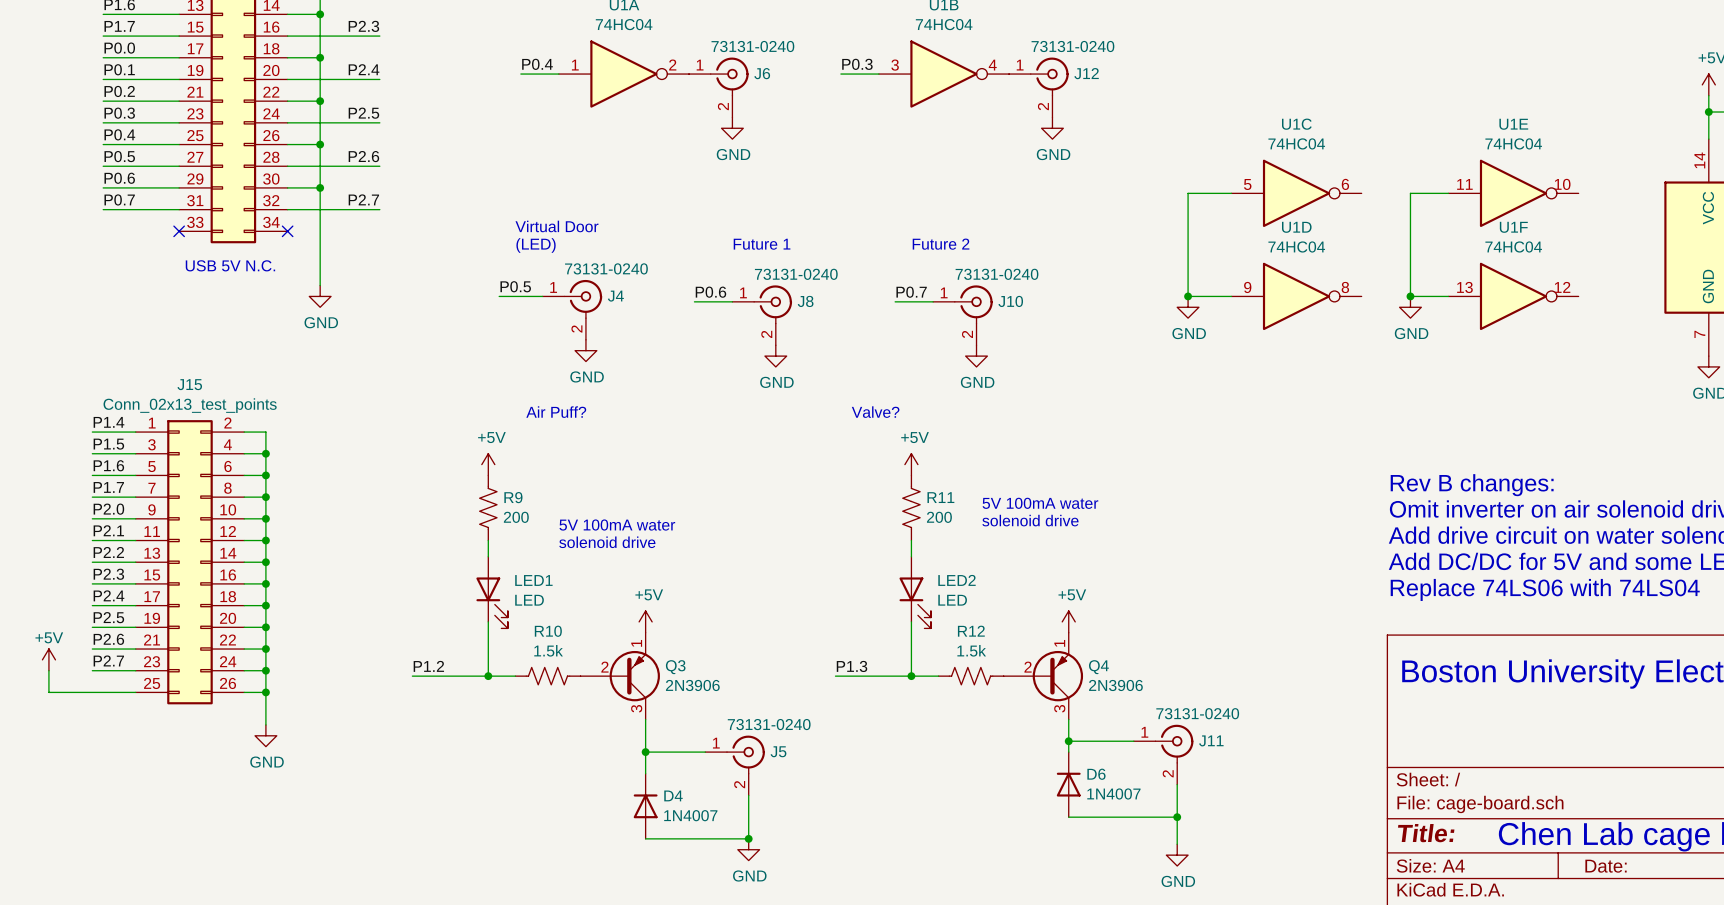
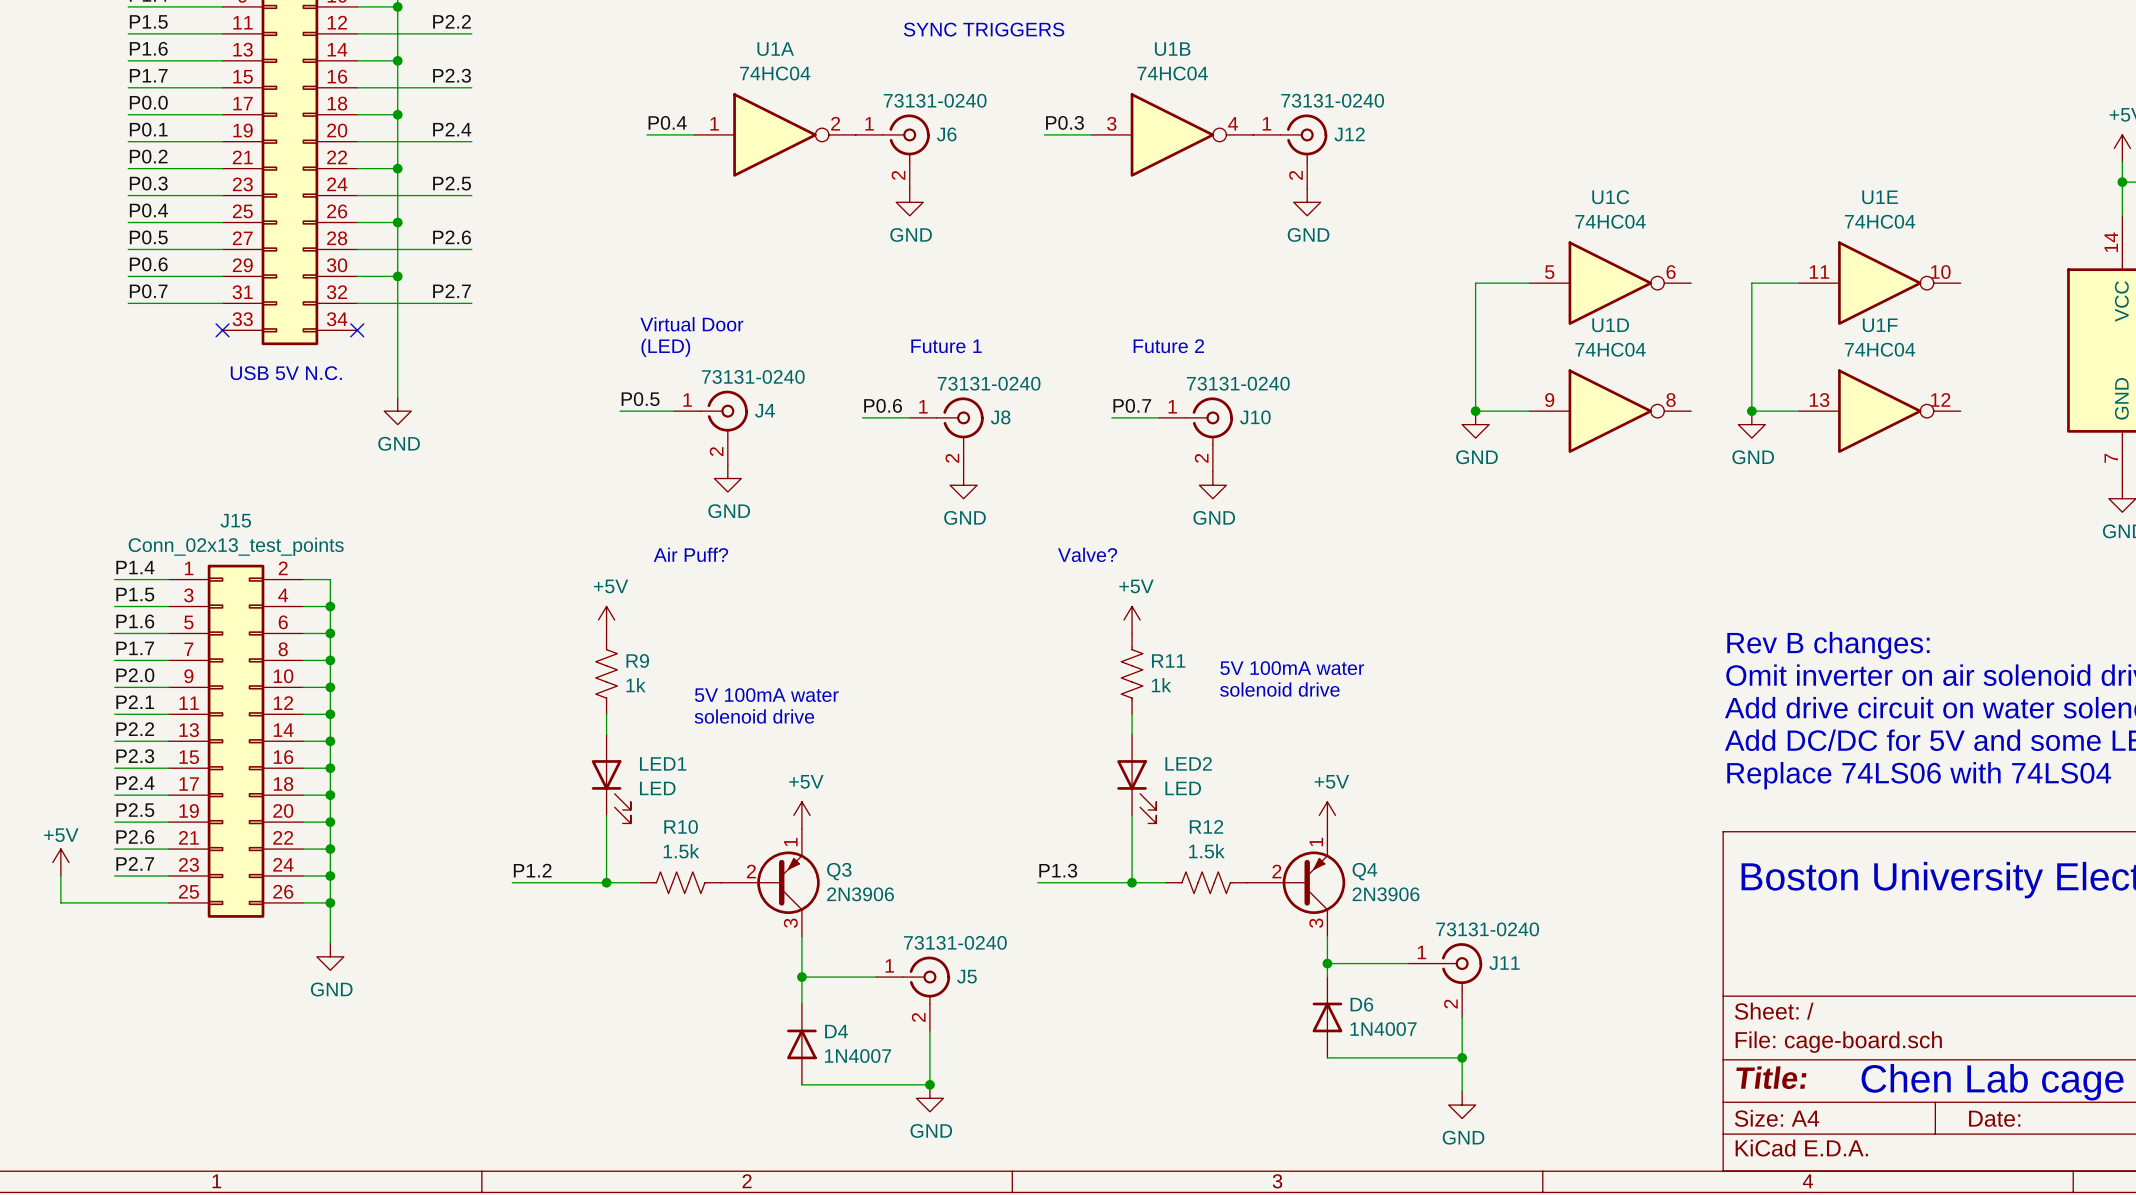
R9 value: 200 (516, 517) -> 1k (635, 685)
R11 value: 200 (939, 517) -> 1k (1161, 685)

